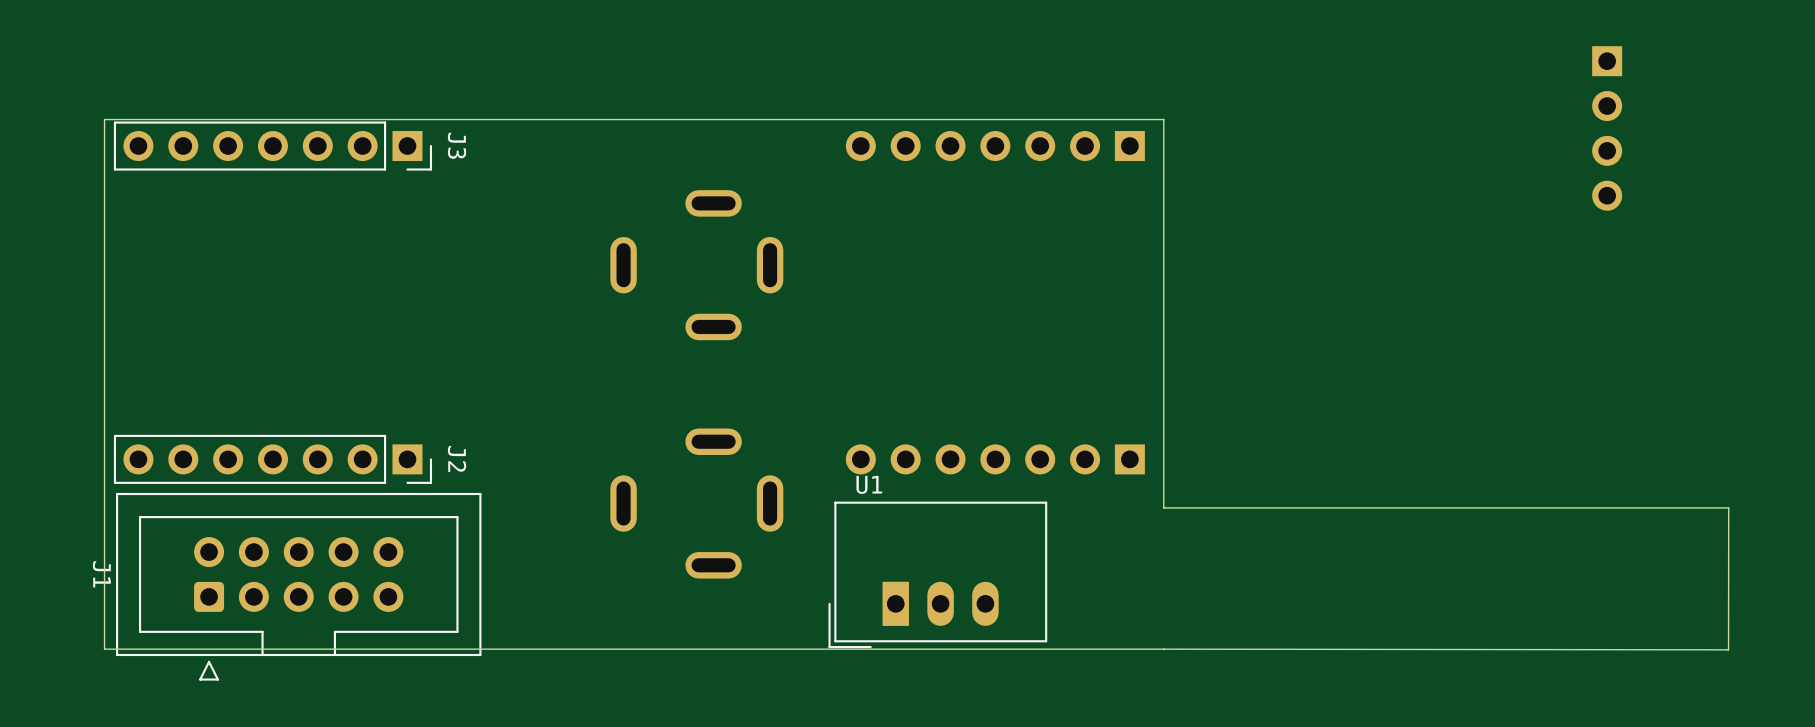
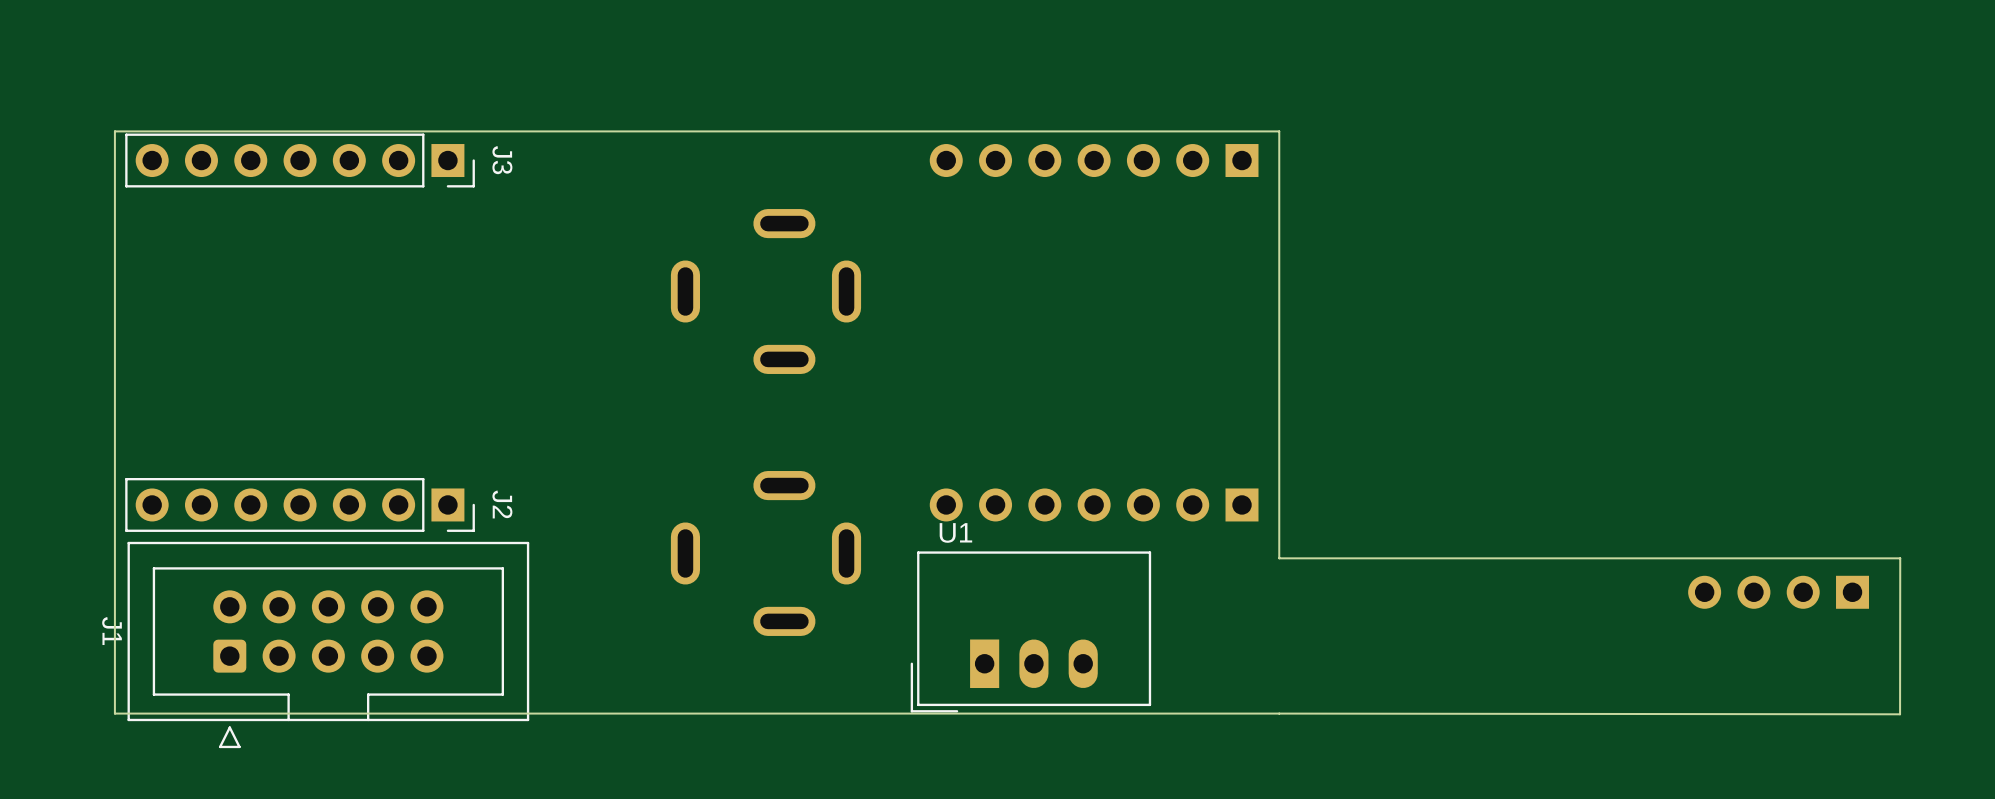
part rotation: 0° (1607, 128) -> 90° clockwise (1778, 592)
part position: (1607, 128) -> (1778, 592)

